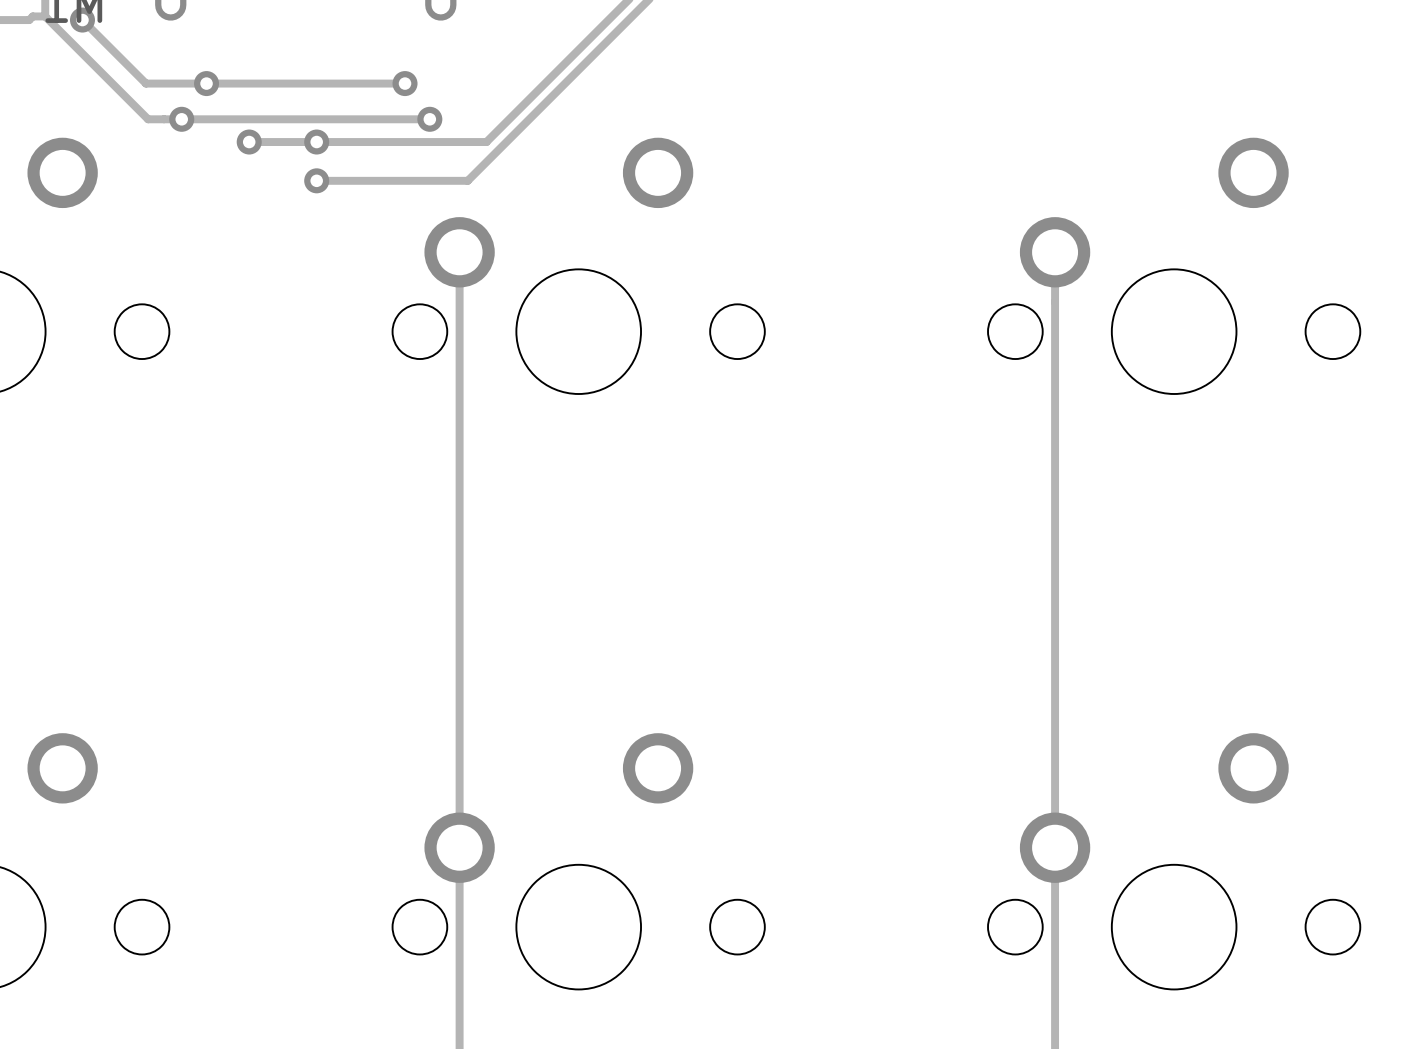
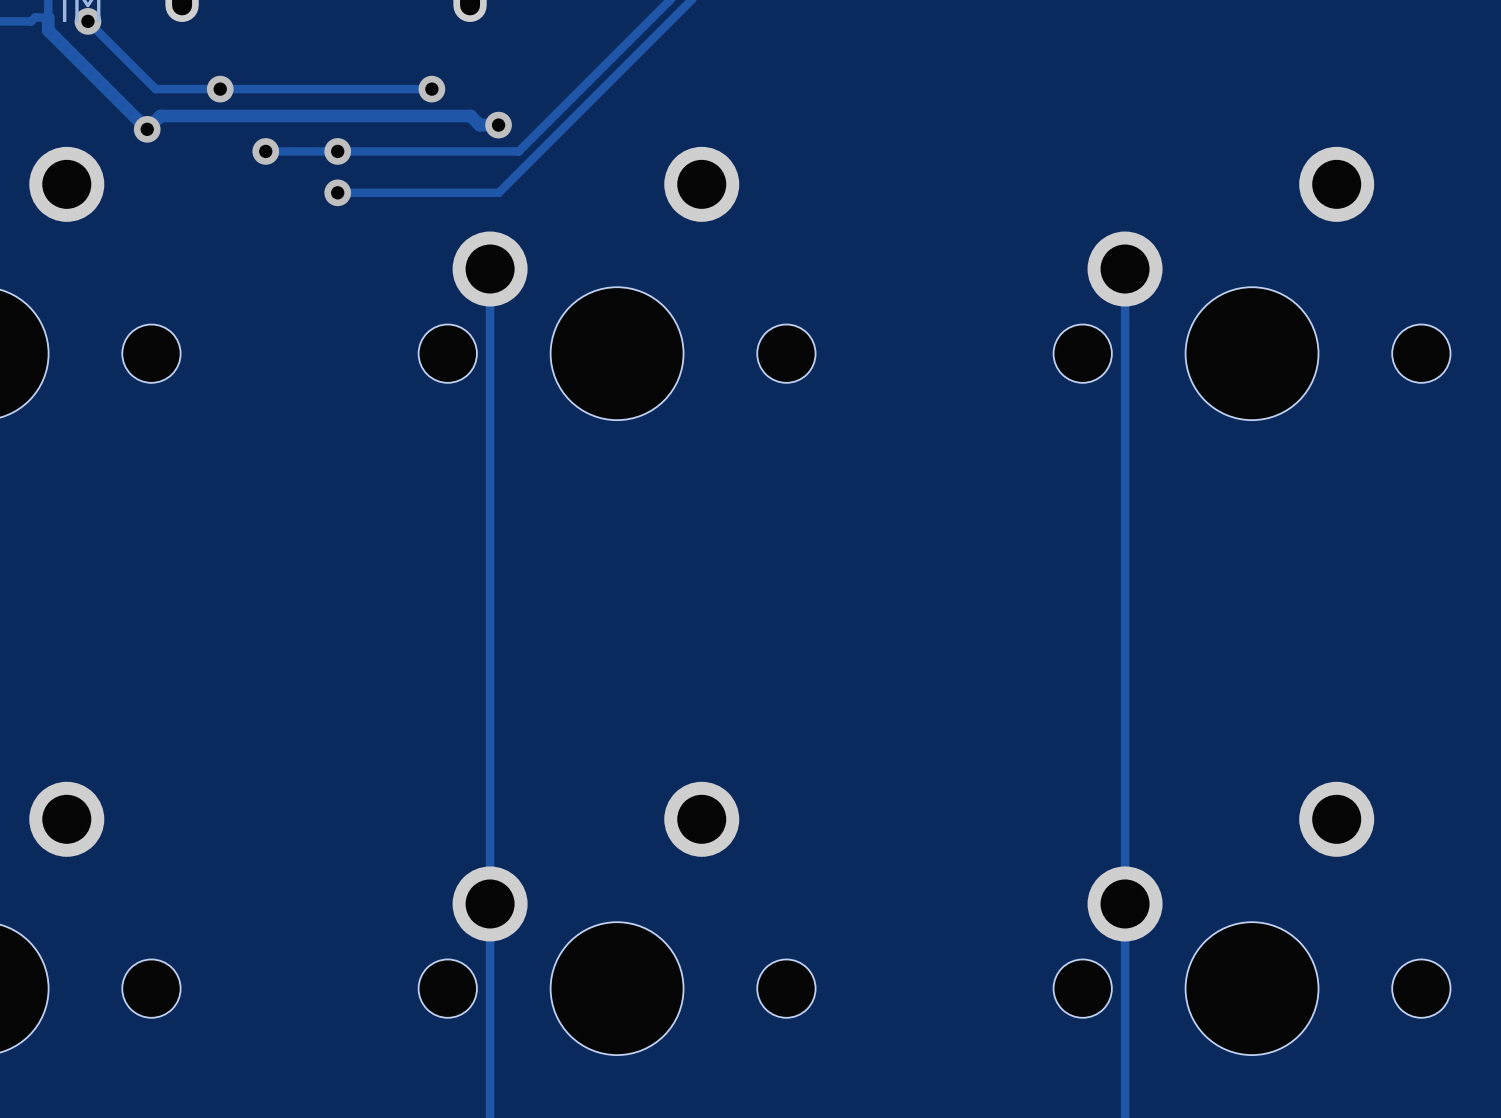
track: (45, 16) (148, 119) (429, 119) -> (48, 17) (48, 30) (147, 129) (160, 115) (470, 115) (479, 125) (498, 125)
via position: (181, 119) -> (147, 129)
via position: (429, 119) -> (498, 125)

